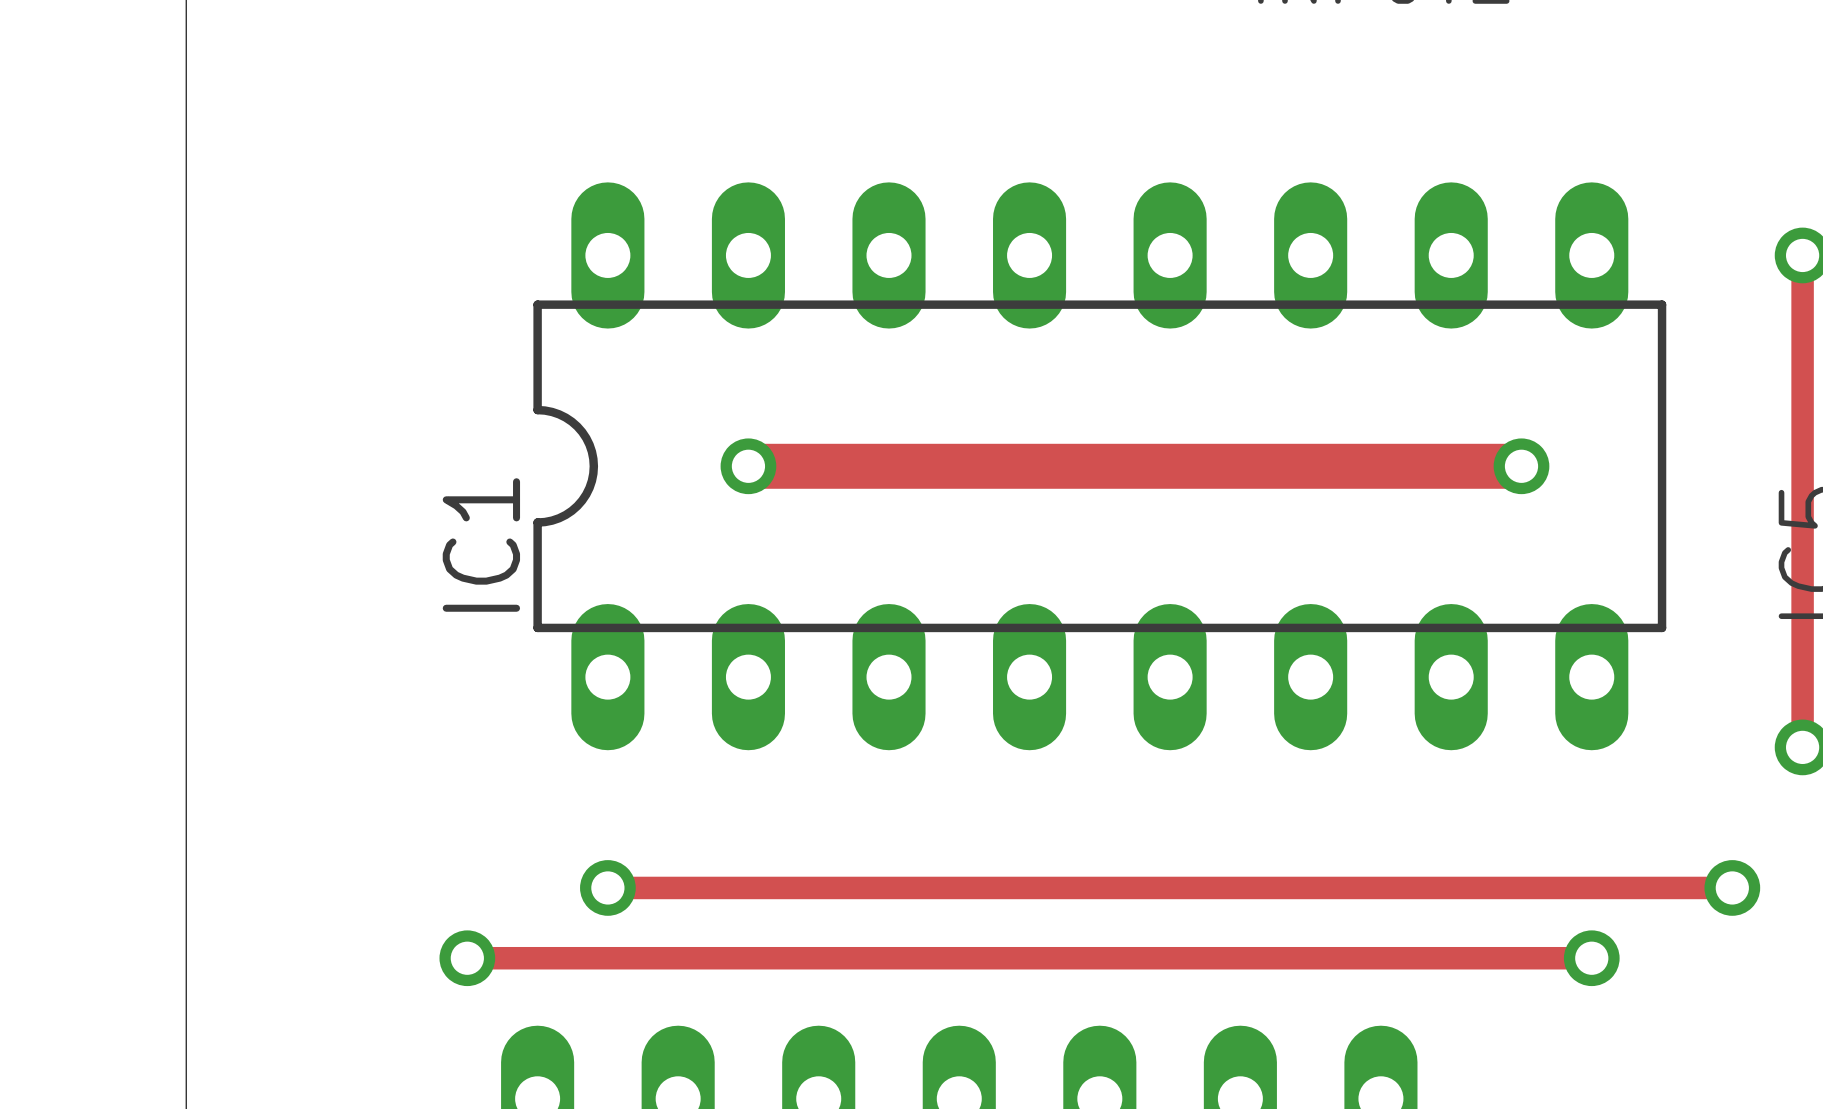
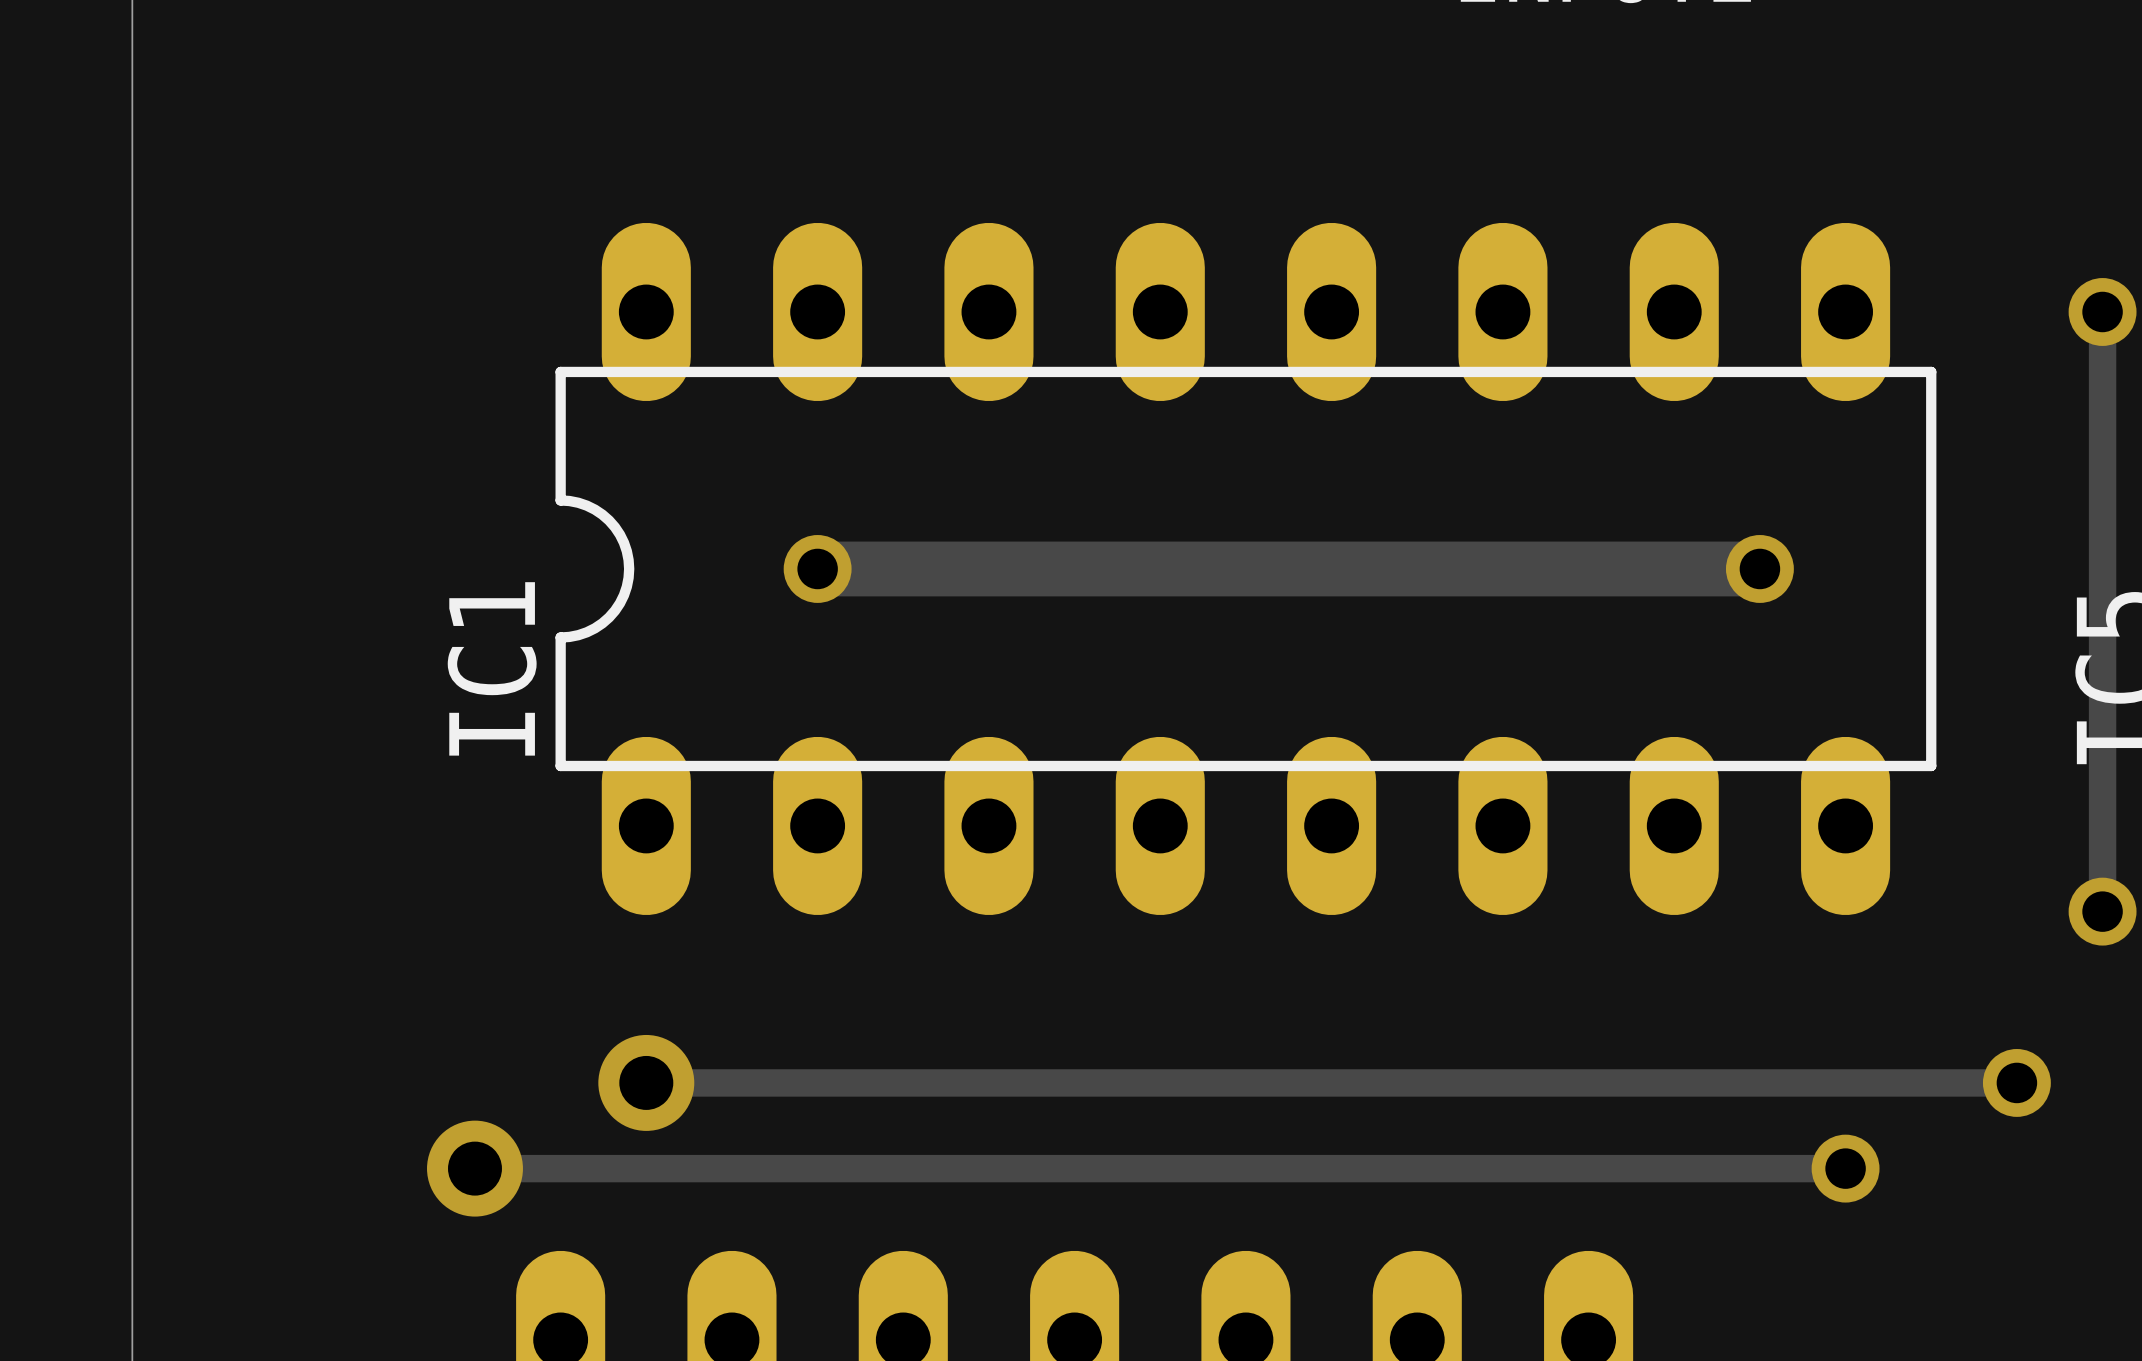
via size: [580, 860, 636, 916] -> [598, 1034, 695, 1131]
via size: [439, 930, 496, 987] -> [427, 1120, 523, 1217]

